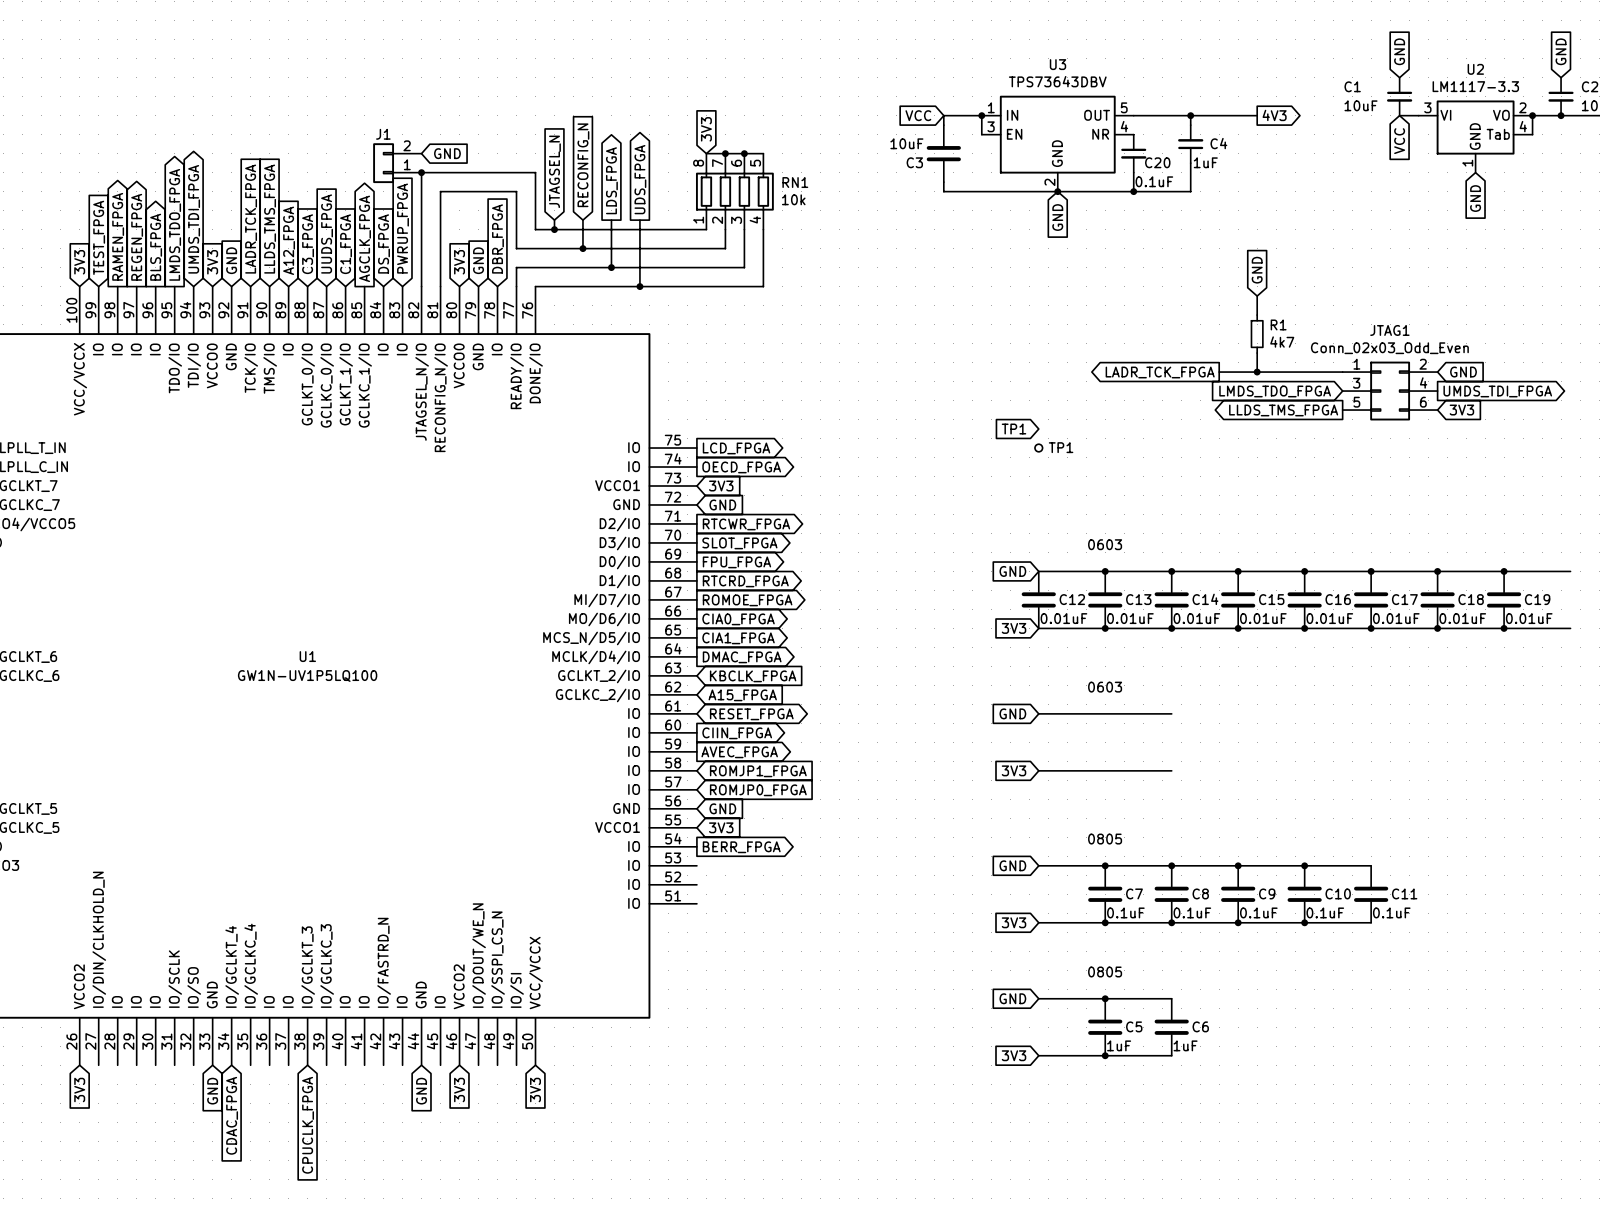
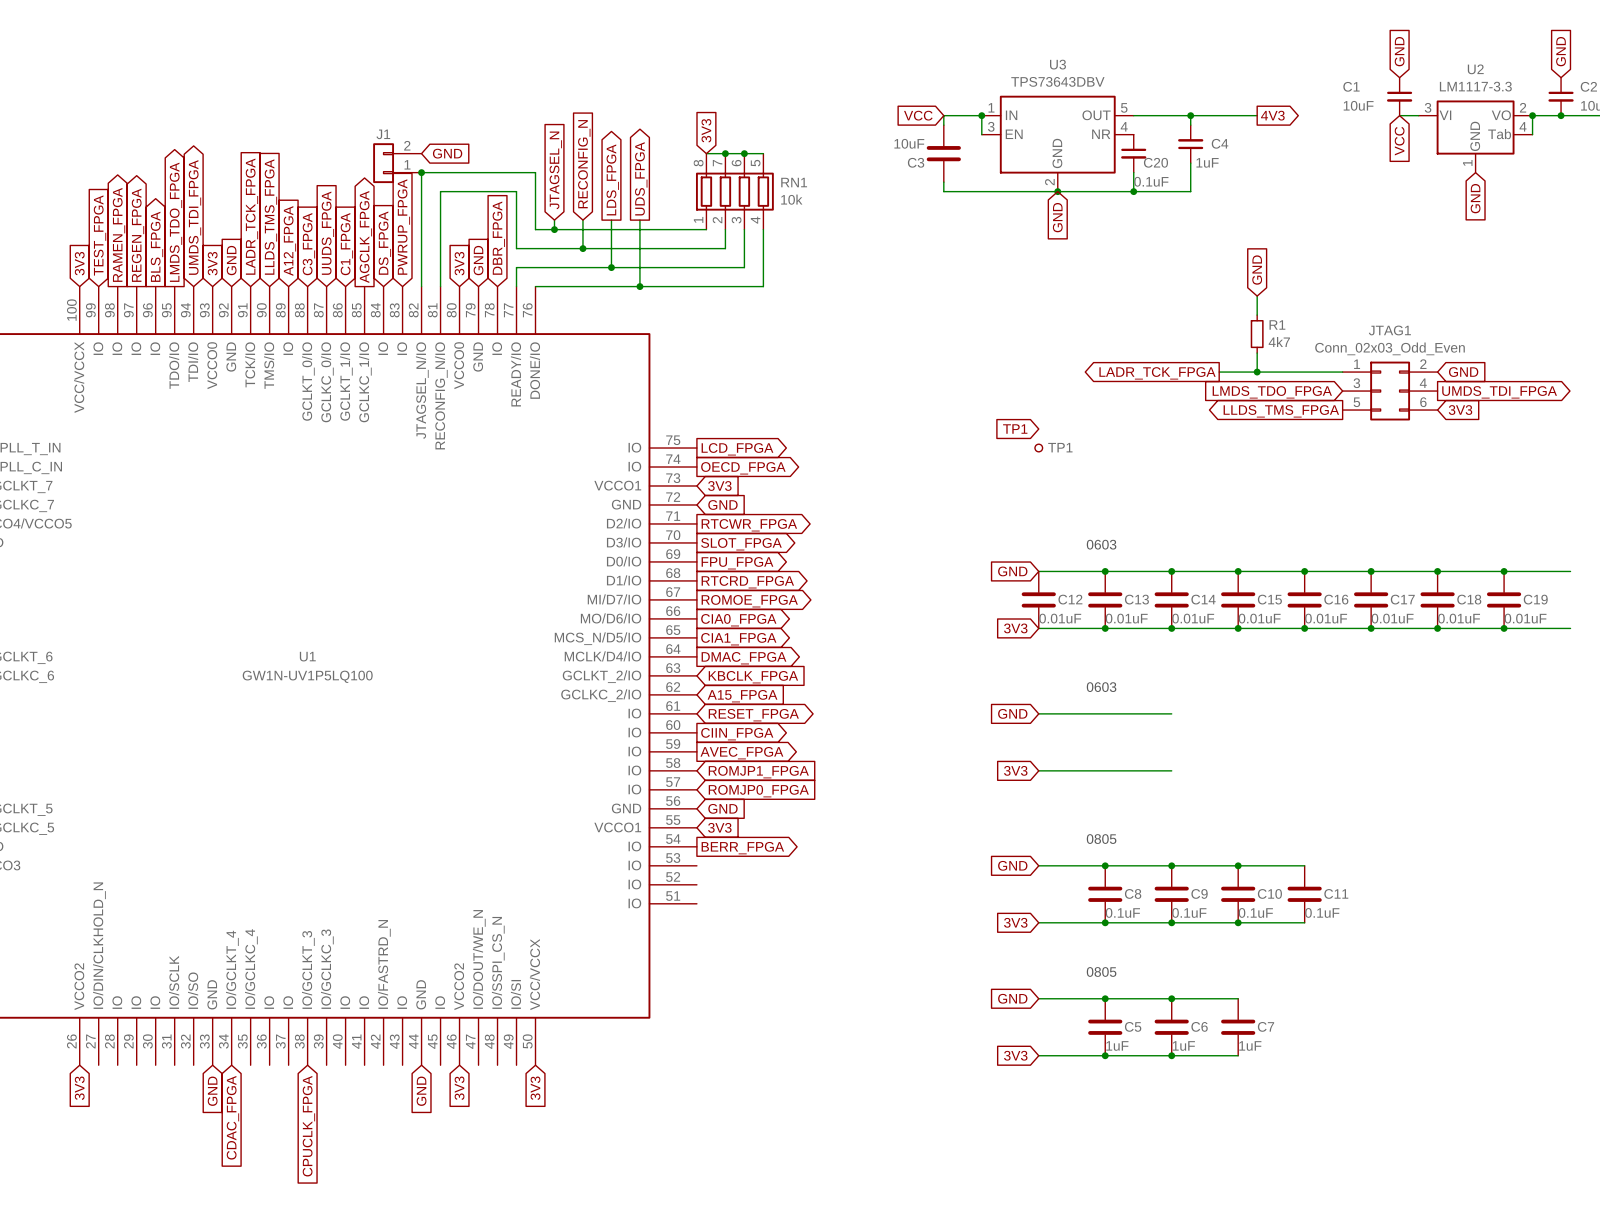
wire: (1304, 865) (1371, 865) -> none
junction: (1304, 865) -> none
C7 name: C7 (1134, 893) -> C8 (1133, 893)
C8 name: C8 (1200, 893) -> C9 (1199, 893)
C9 name: C9 (1267, 893) -> C10 (1269, 893)
C10 name: C10 (1338, 893) -> C11 (1336, 893)
C11: 0.1uF (1371, 894) -> none
wire: (1304, 922) (1371, 922) -> (1171, 998) (1238, 998)
junction: (1304, 922) -> none
junction: none -> (1171, 998)
C7: none -> 1uF (1238, 1027)
wire: none -> (1171, 1055) (1238, 1055)
junction: none -> (1171, 1055)

